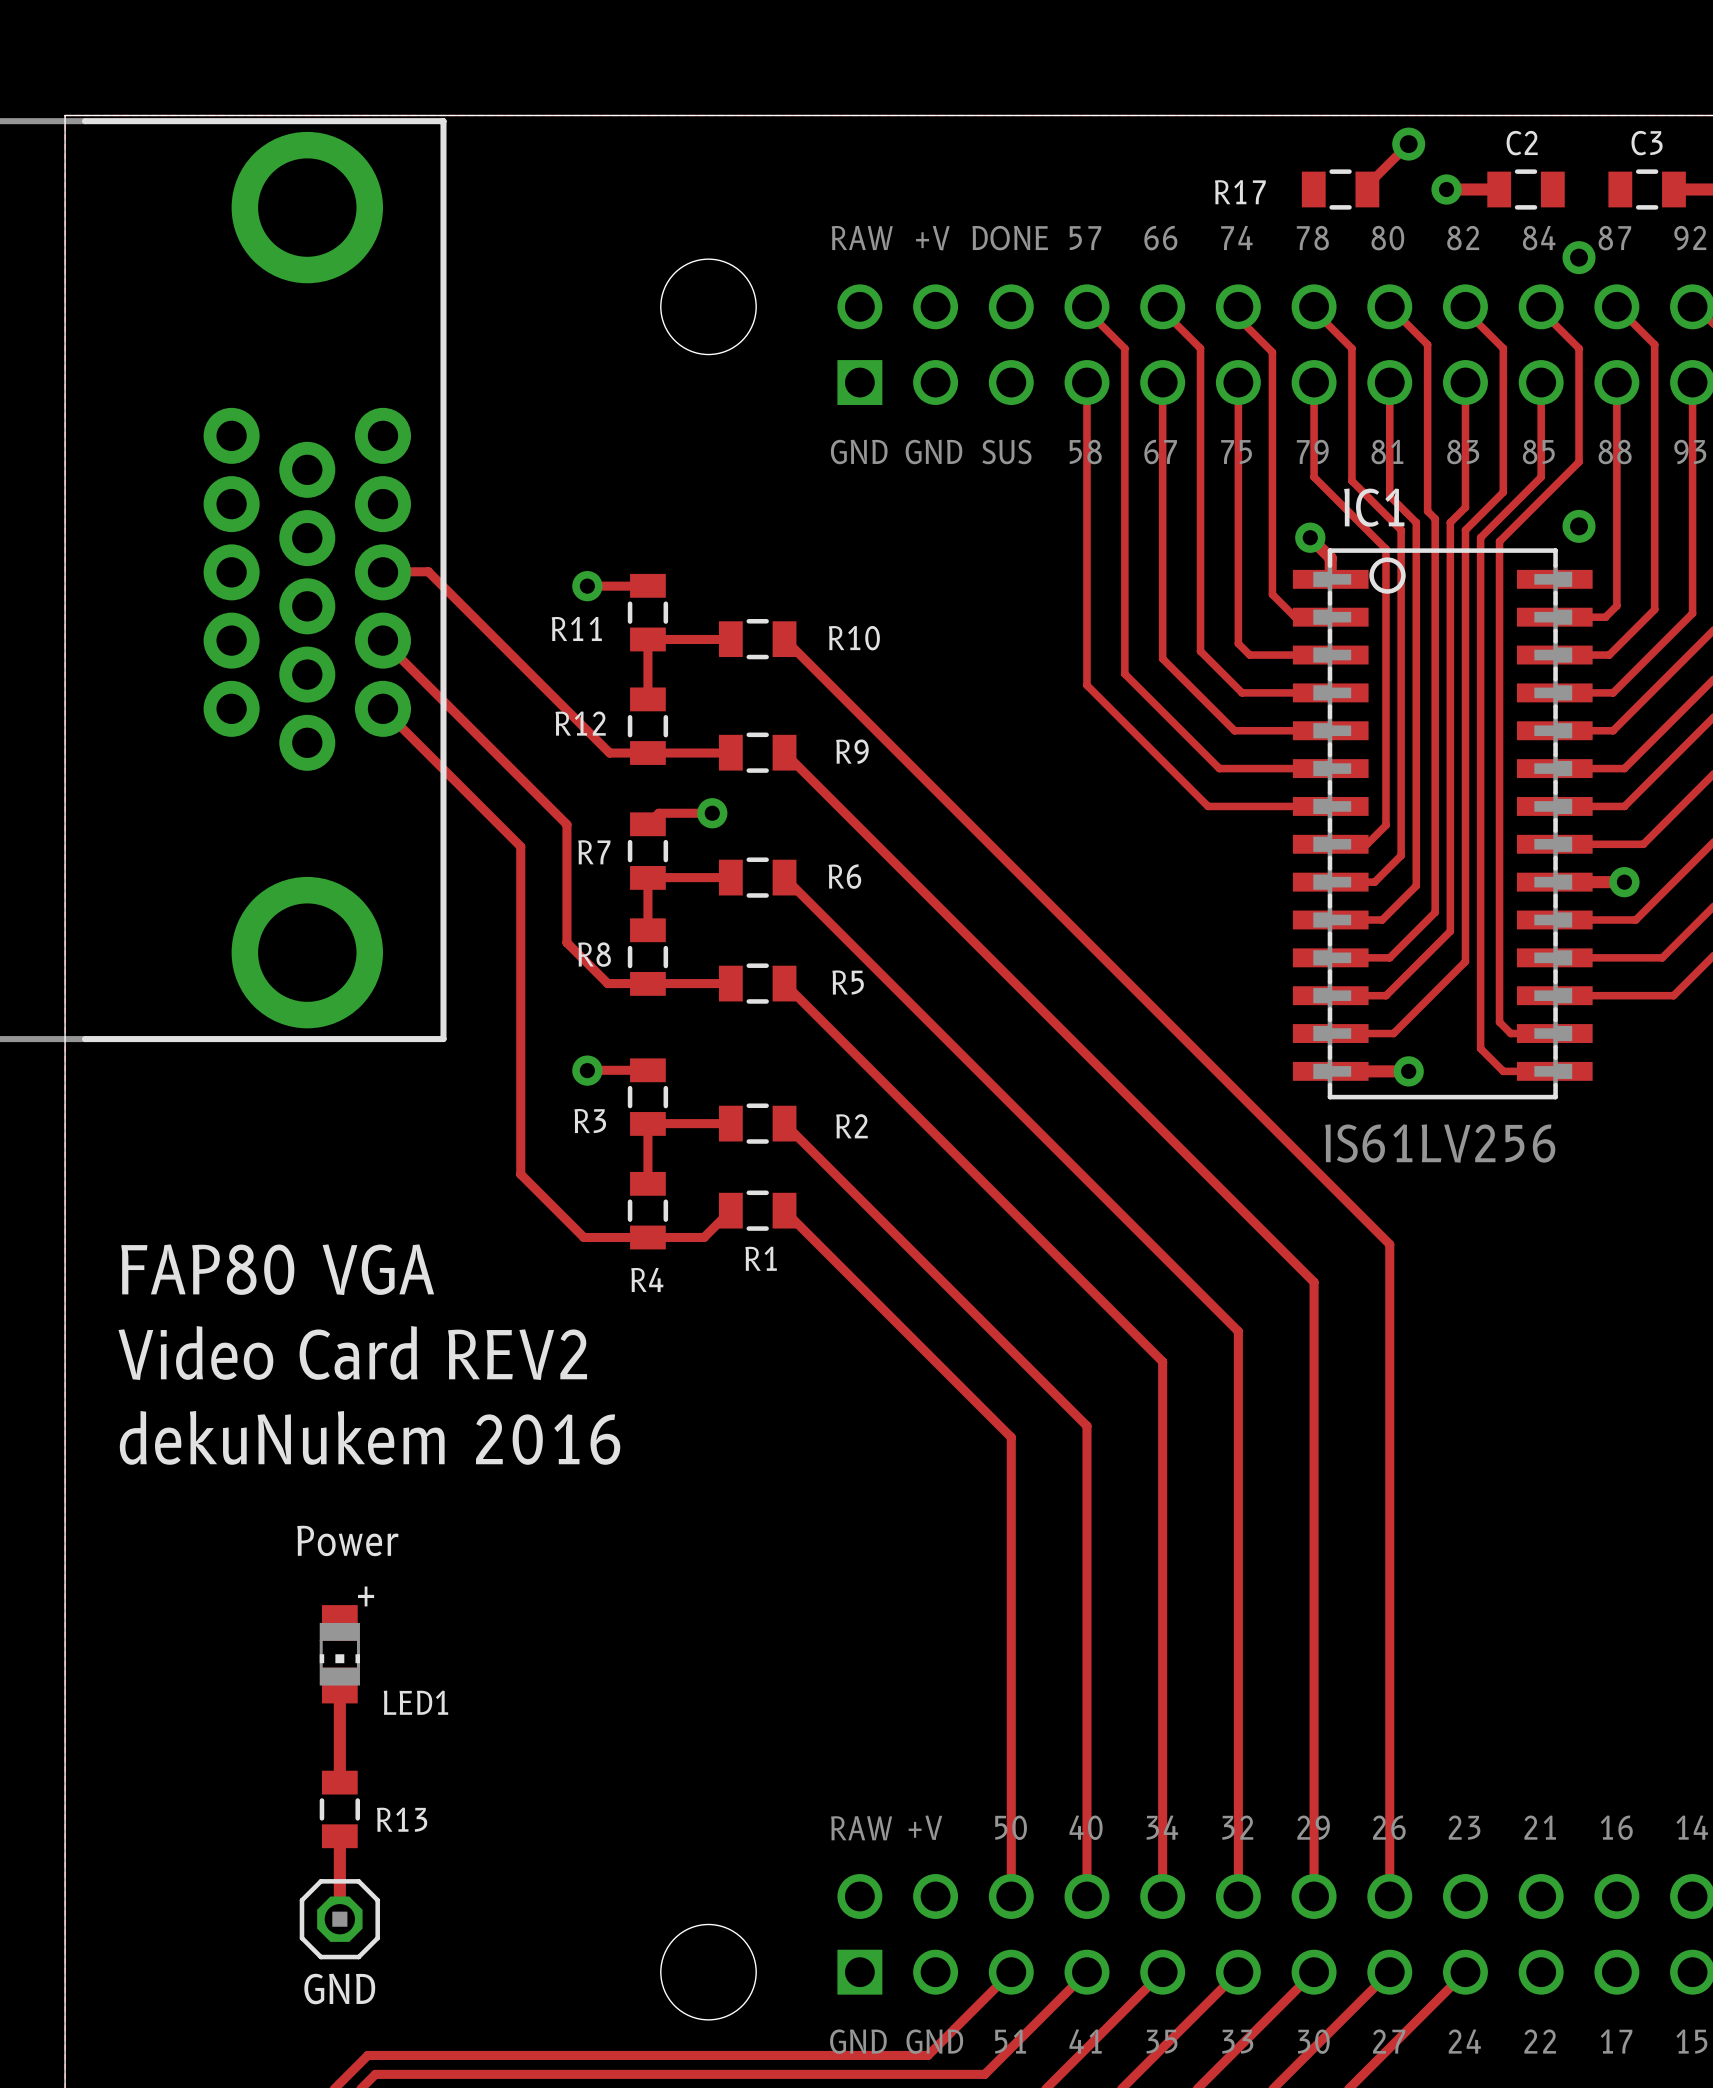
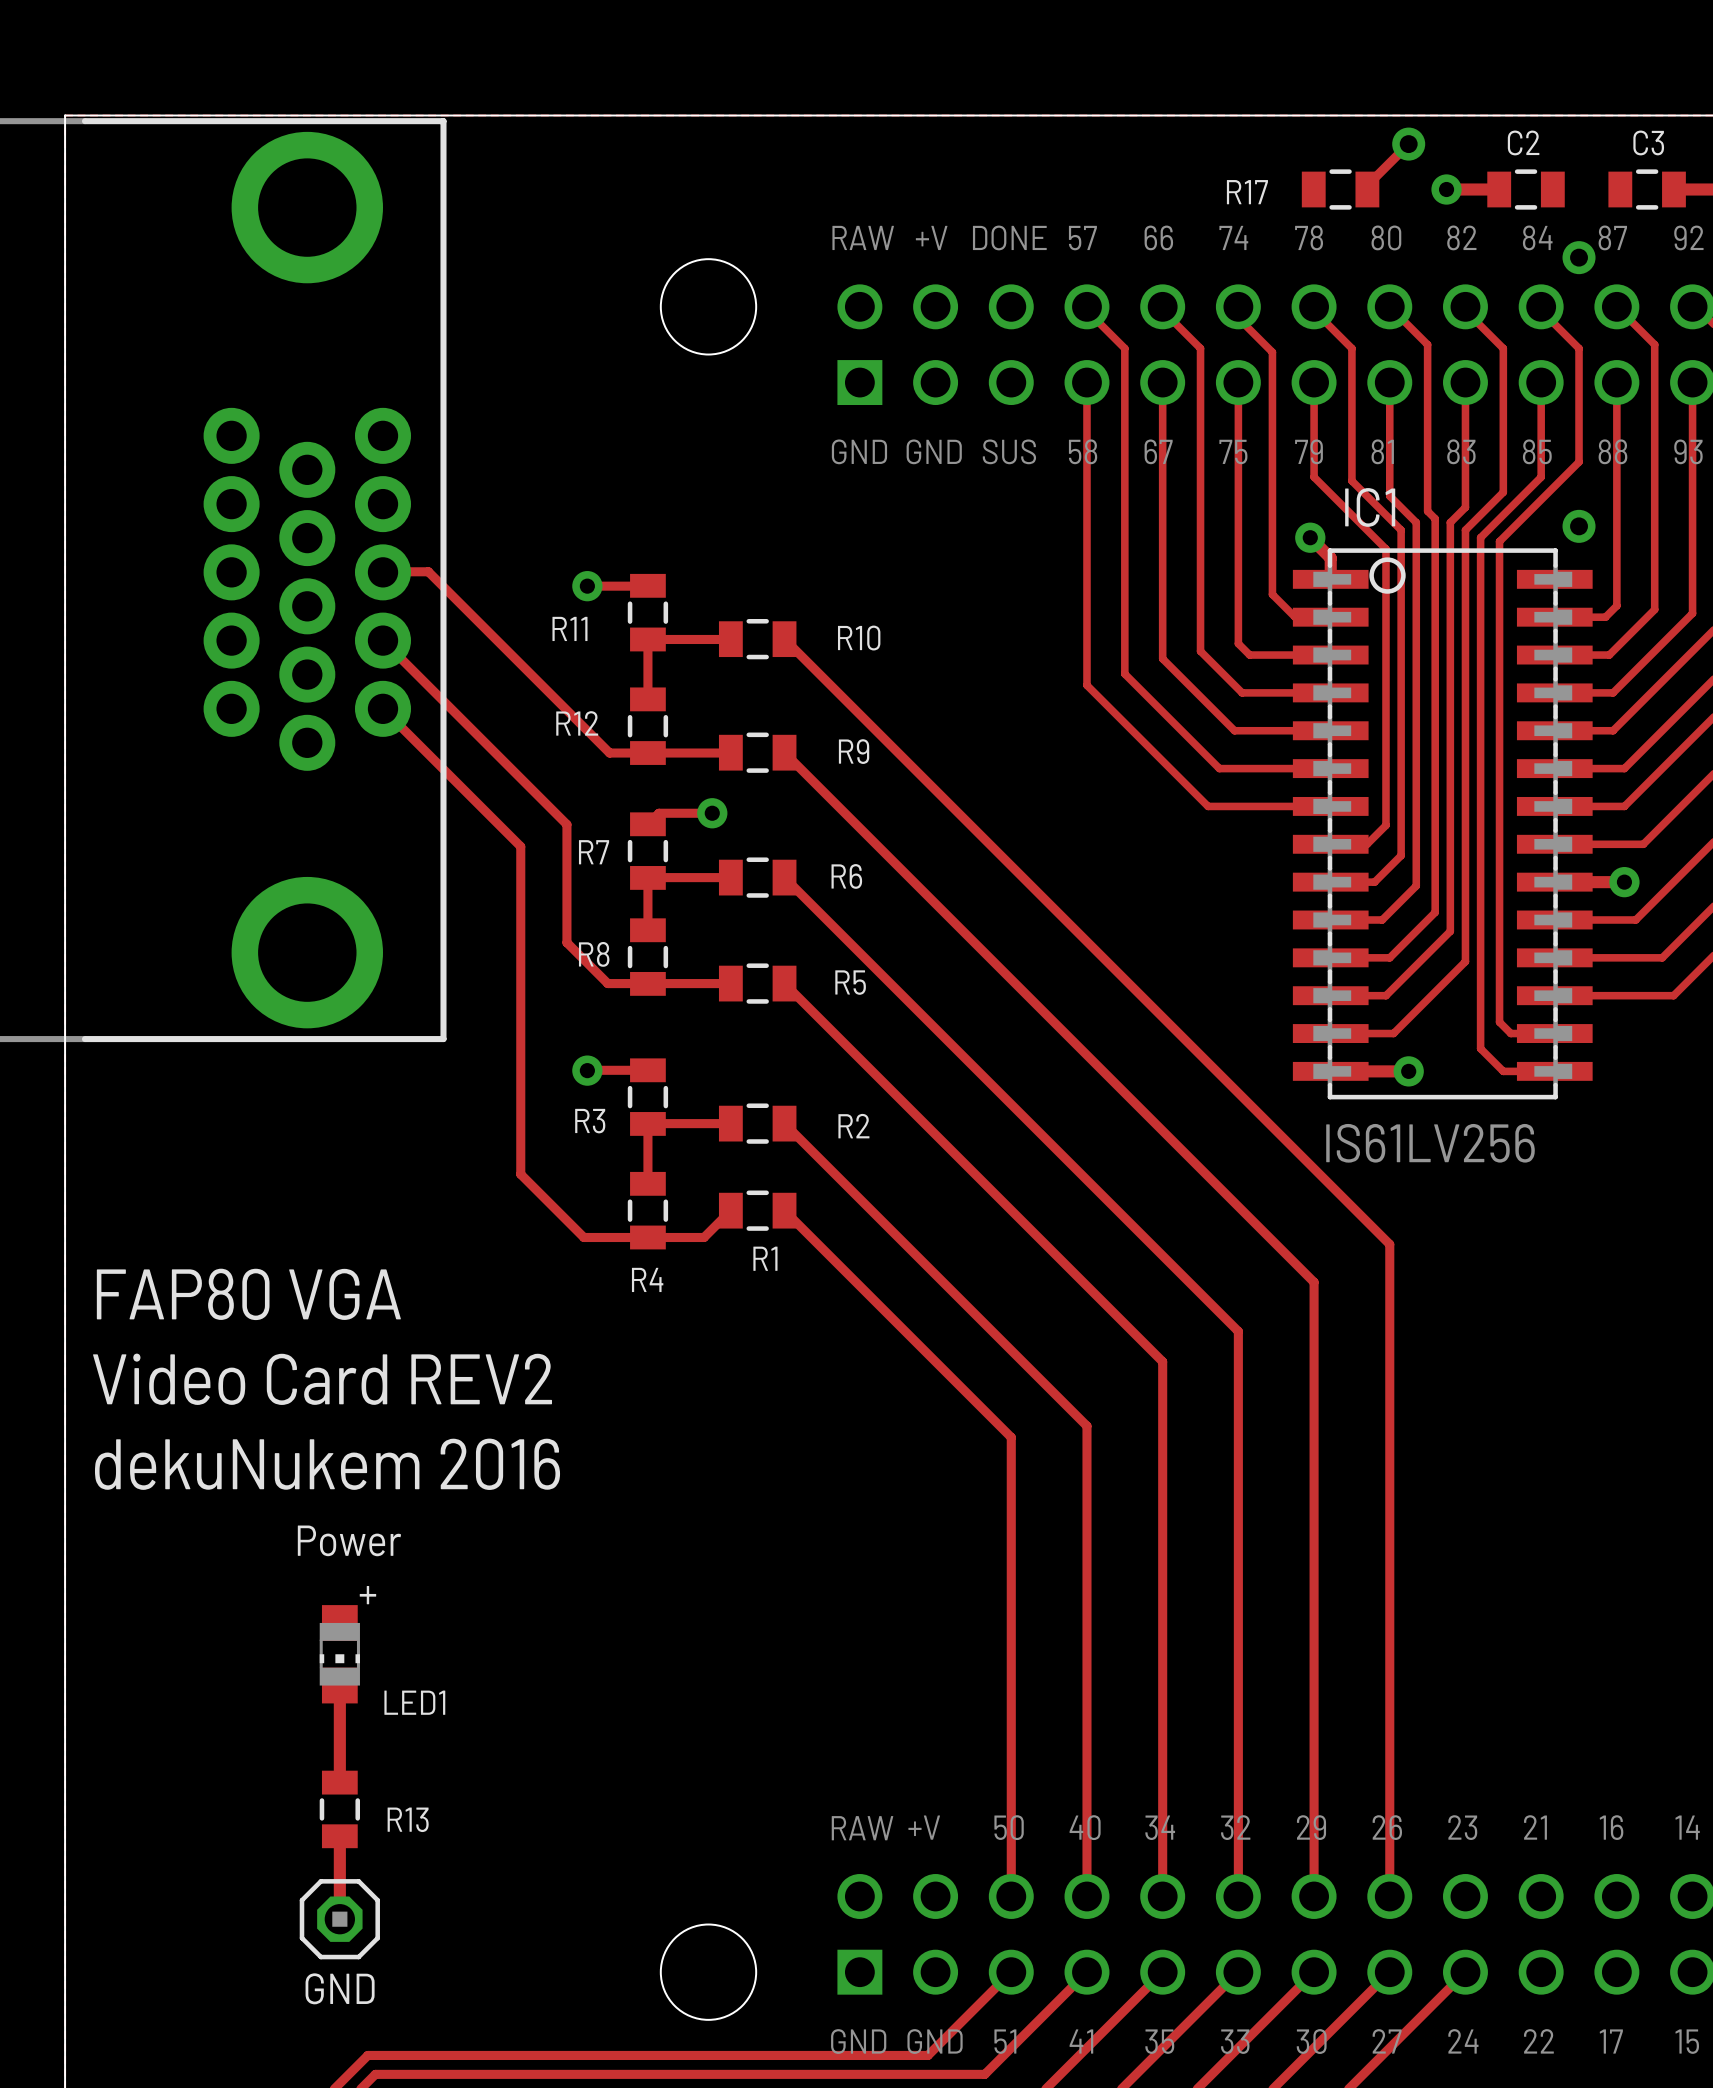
text position: FAP80 VGA (277, 1269) -> FAP80 VGA (248, 1294)
text position: Video Card REV2 (352, 1353) -> Video Card REV2 (322, 1379)
text position: dekuNukem 2016 (370, 1437) -> dekuNukem 2016 (327, 1464)

